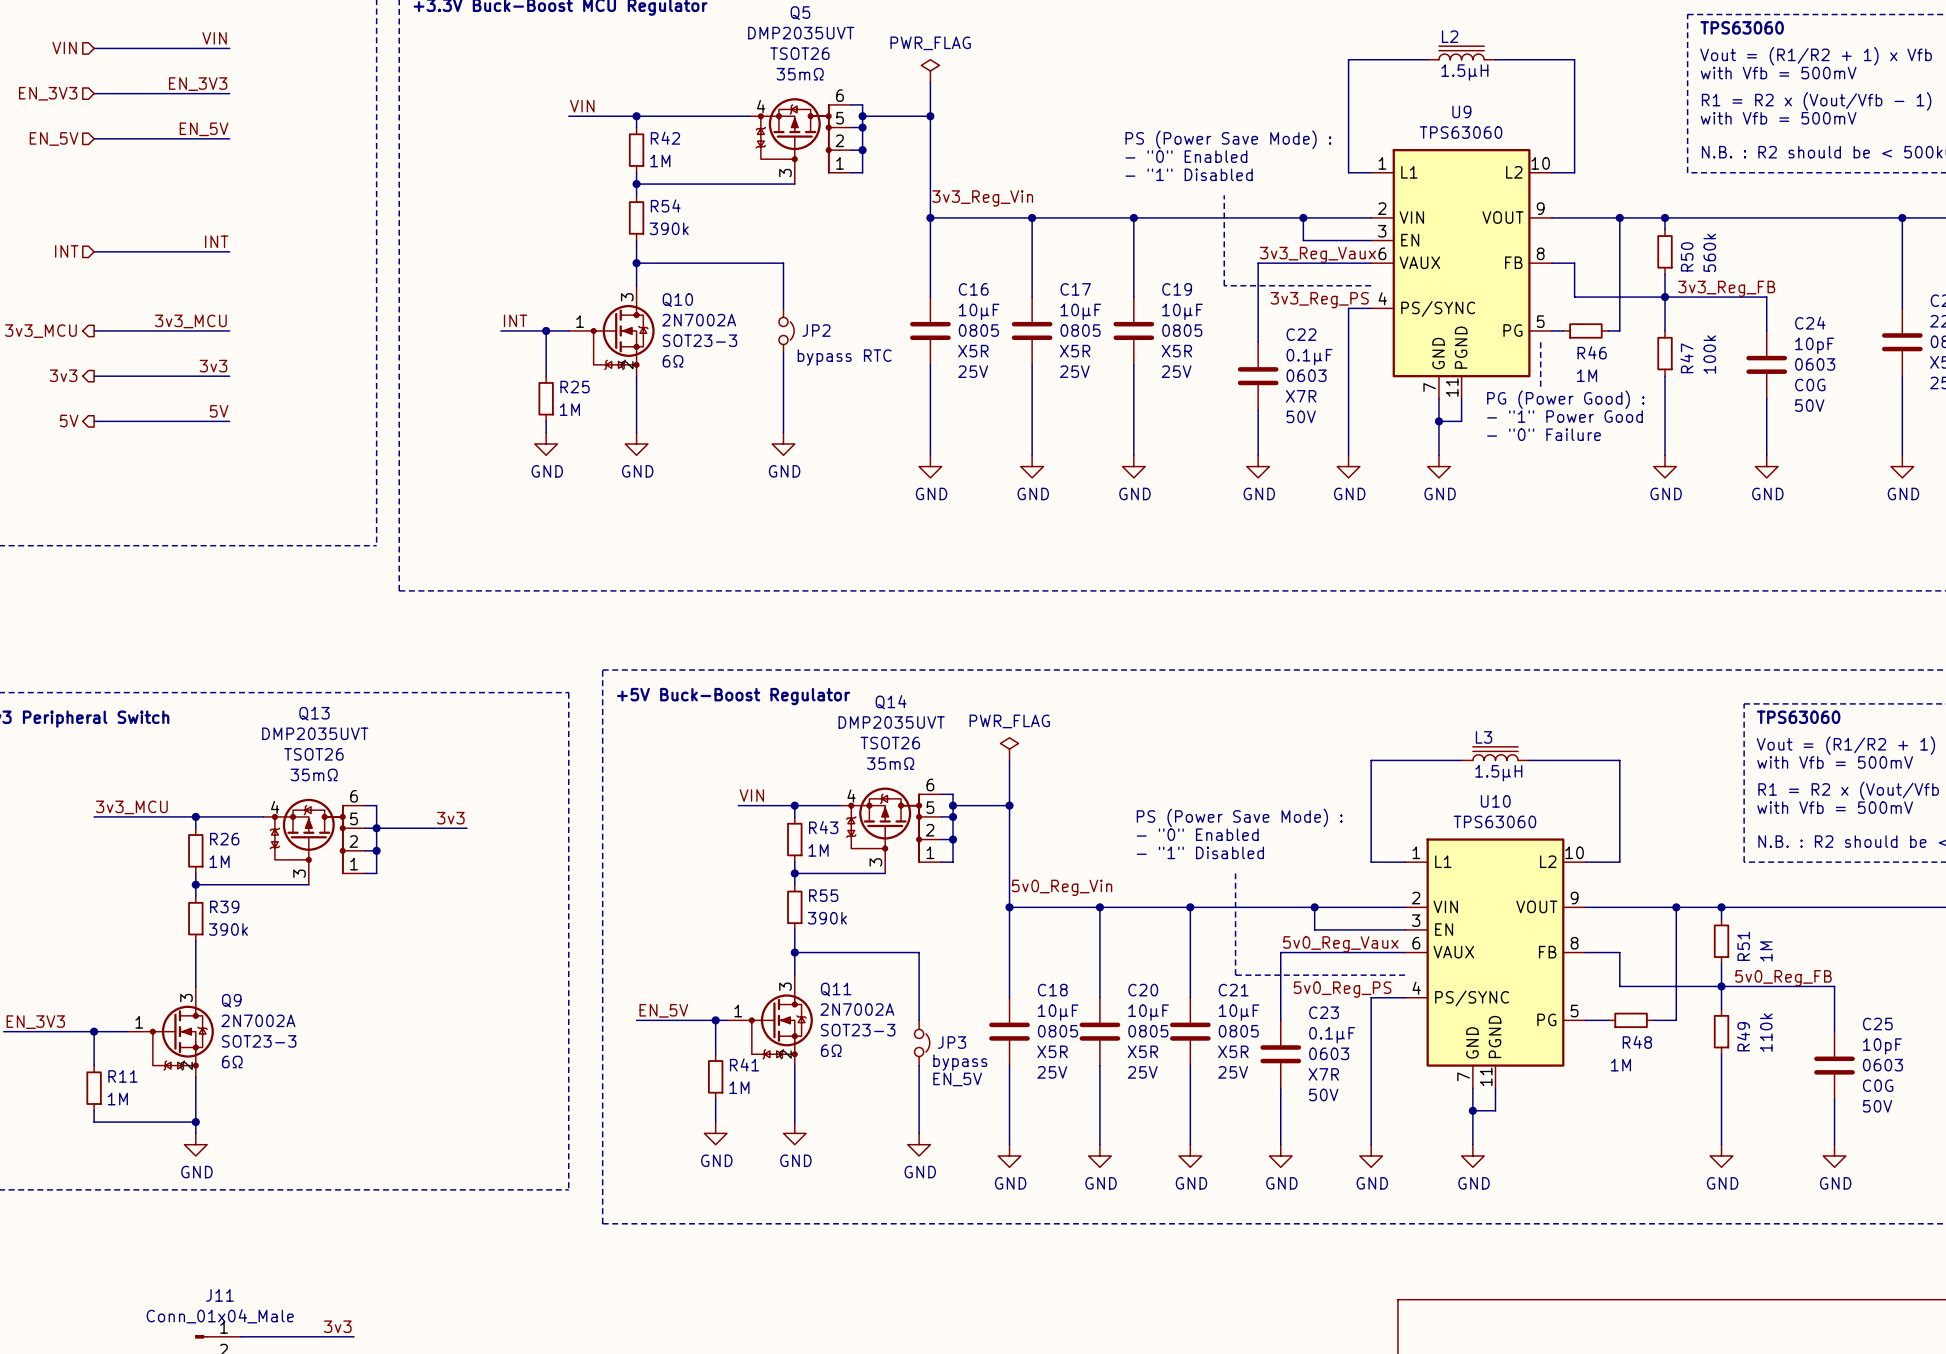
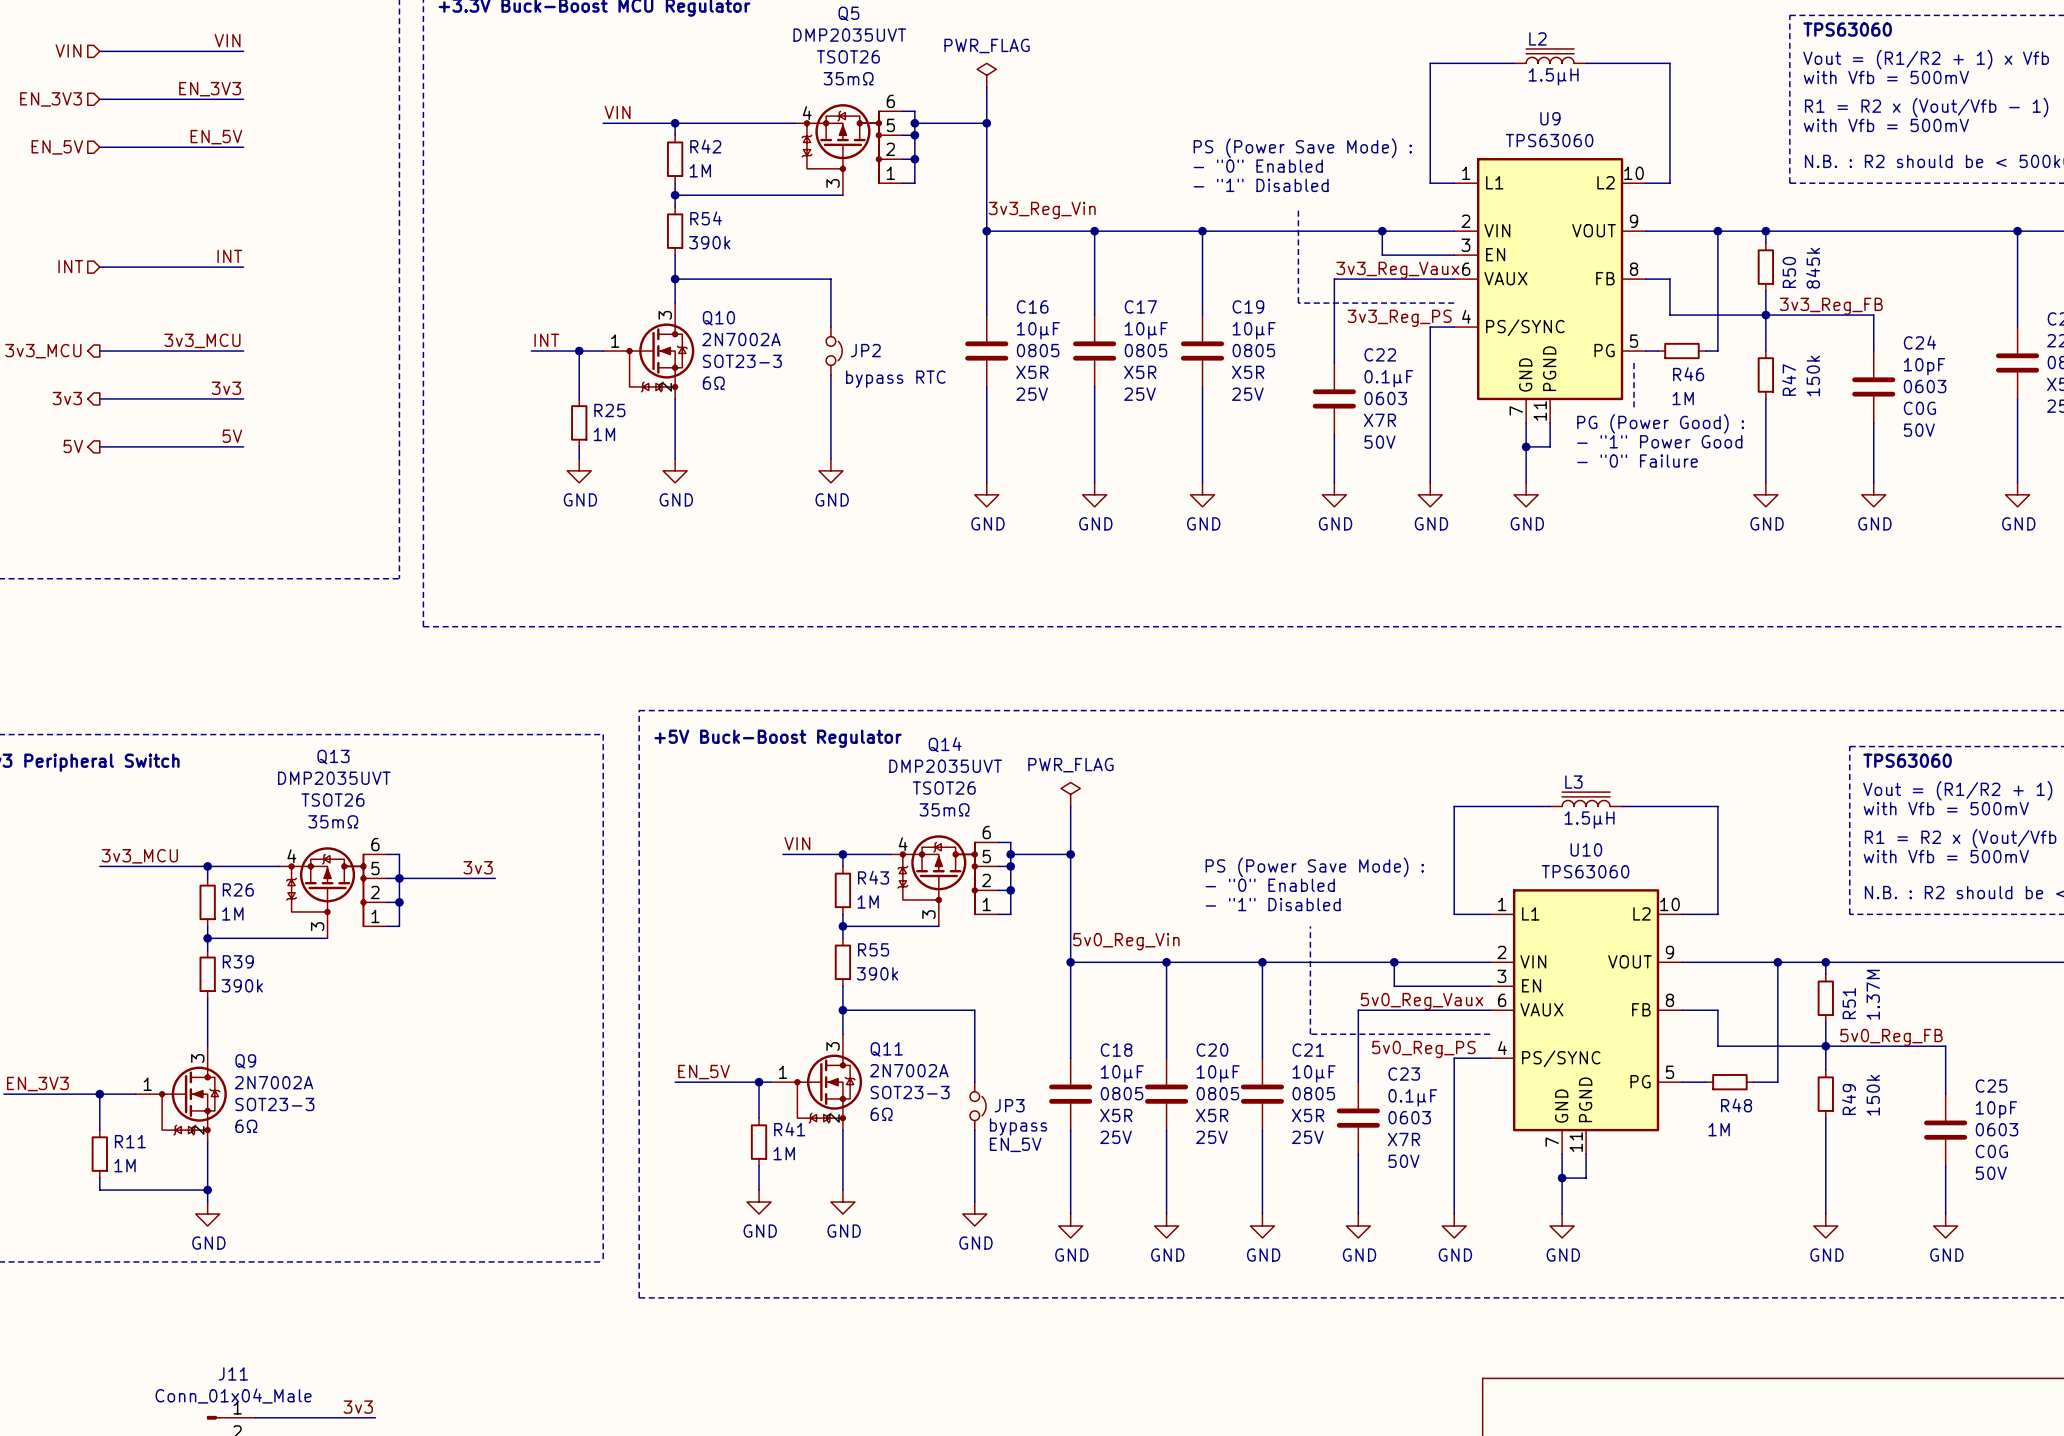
R50 value: 560k (1709, 252) -> 845k (1813, 268)
R47 value: 100k (1709, 354) -> 150k (1813, 376)
R51 value: 1M (1766, 951) -> 1.37M (1873, 994)
R49 value: 110k (1766, 1032) -> 150k (1873, 1095)

